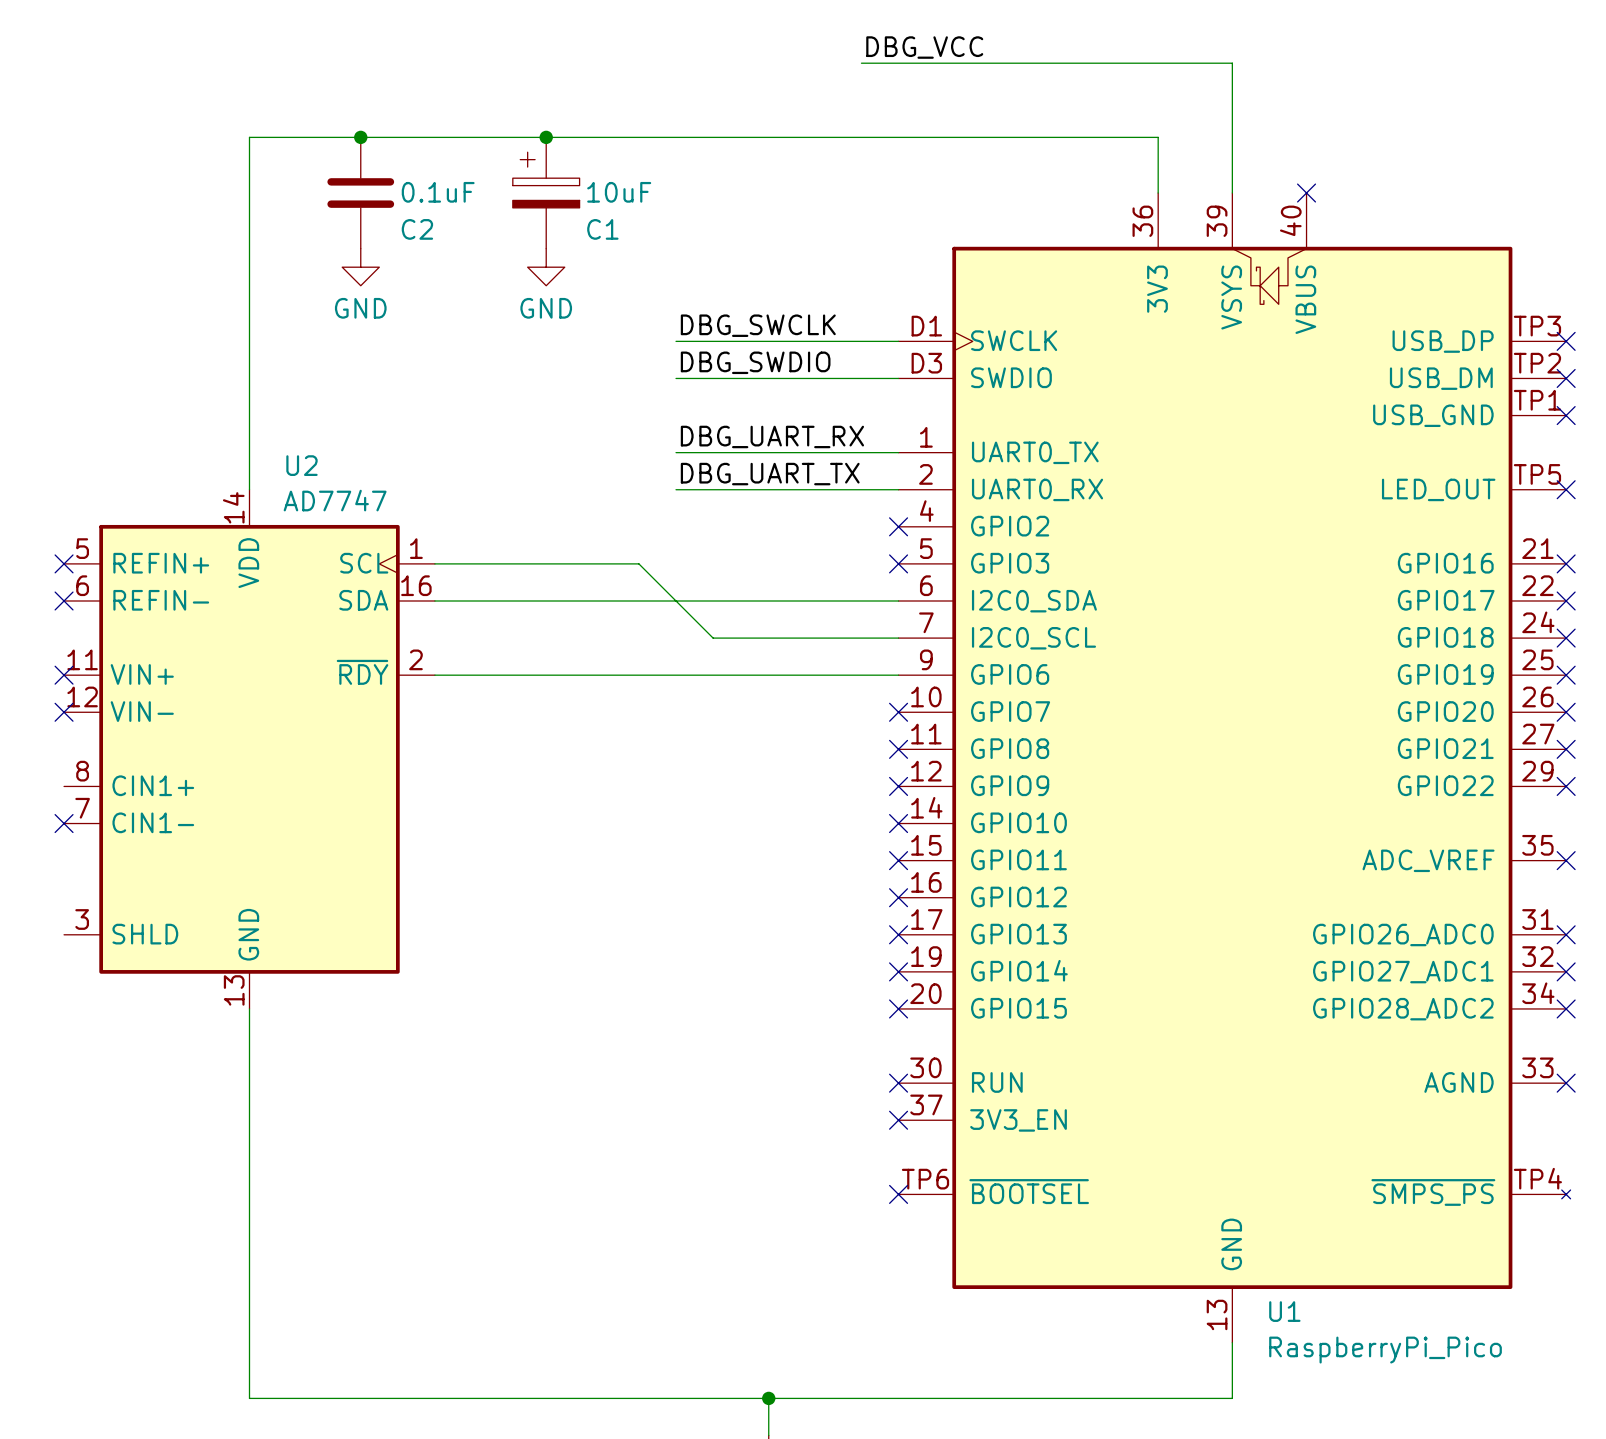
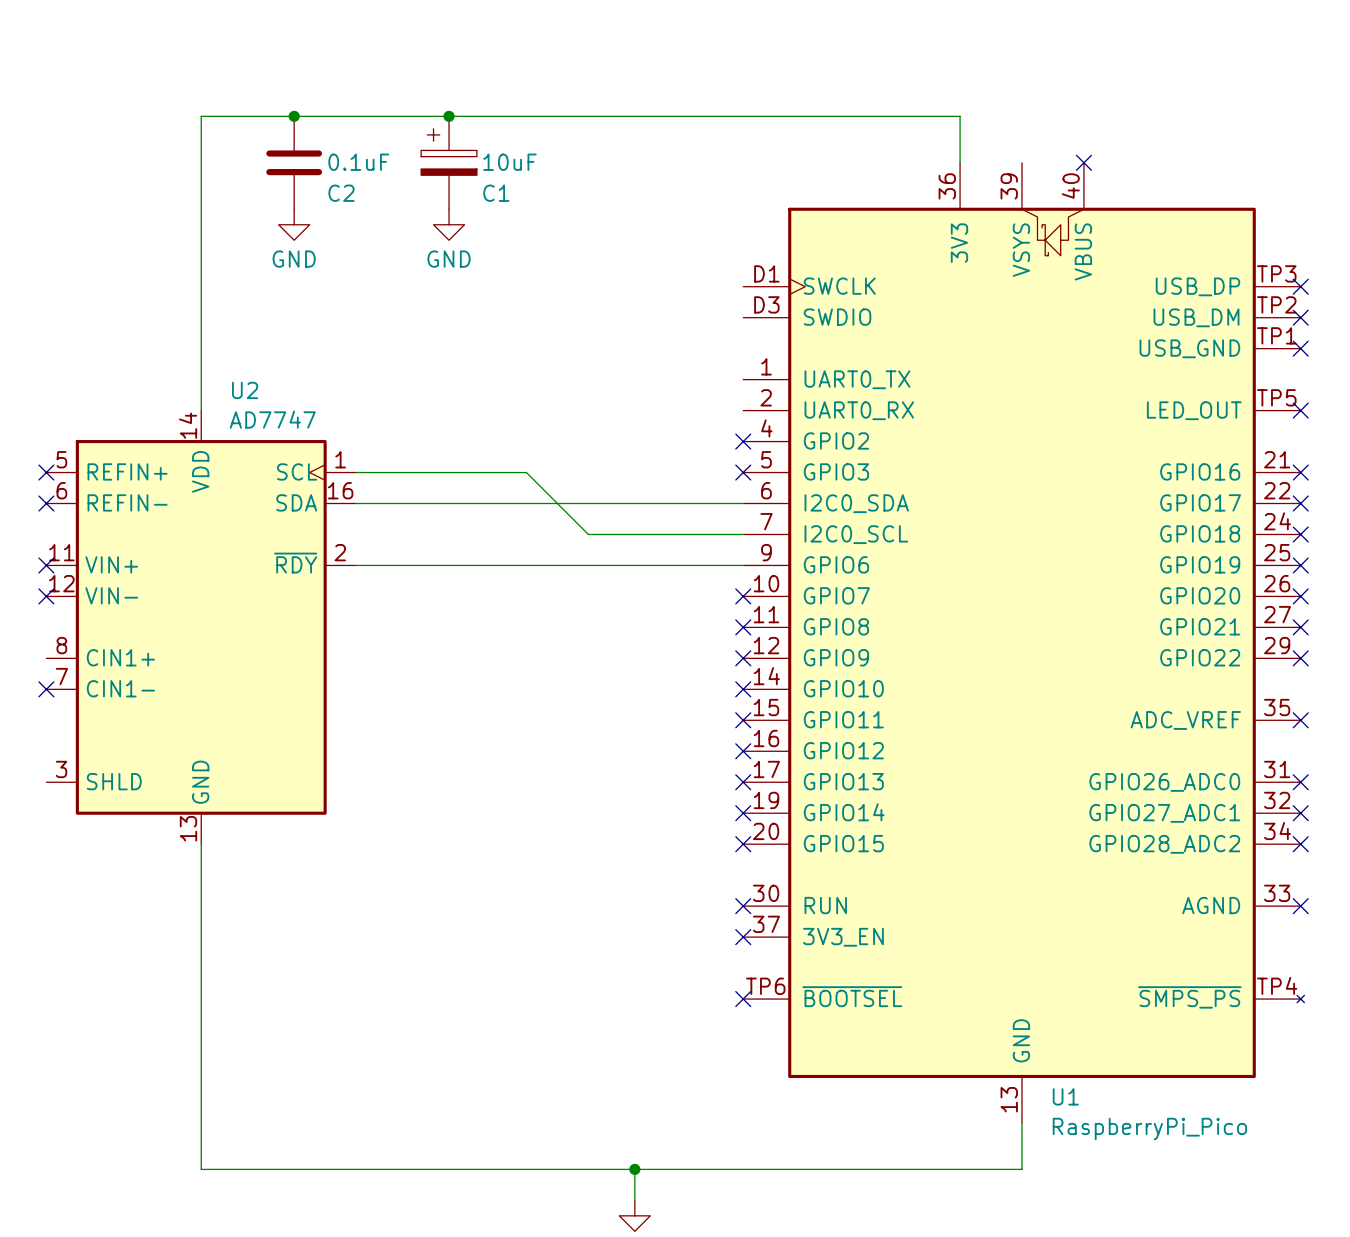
label: DBG_VCC (924, 47) -> none
wire: (861, 63) (1232, 63) (1232, 193) -> none
label: DBG_SWCLK (758, 325) -> none
wire: (676, 341) (898, 341) -> none
label: DBG_SWDIO (755, 362) -> none
wire: (676, 378) (898, 378) -> none
label: DBG_UART_RX (772, 436) -> none
wire: (676, 452) (898, 452) -> none
label: DBG_UART_TX (770, 474) -> none
wire: (676, 489) (898, 489) -> none

